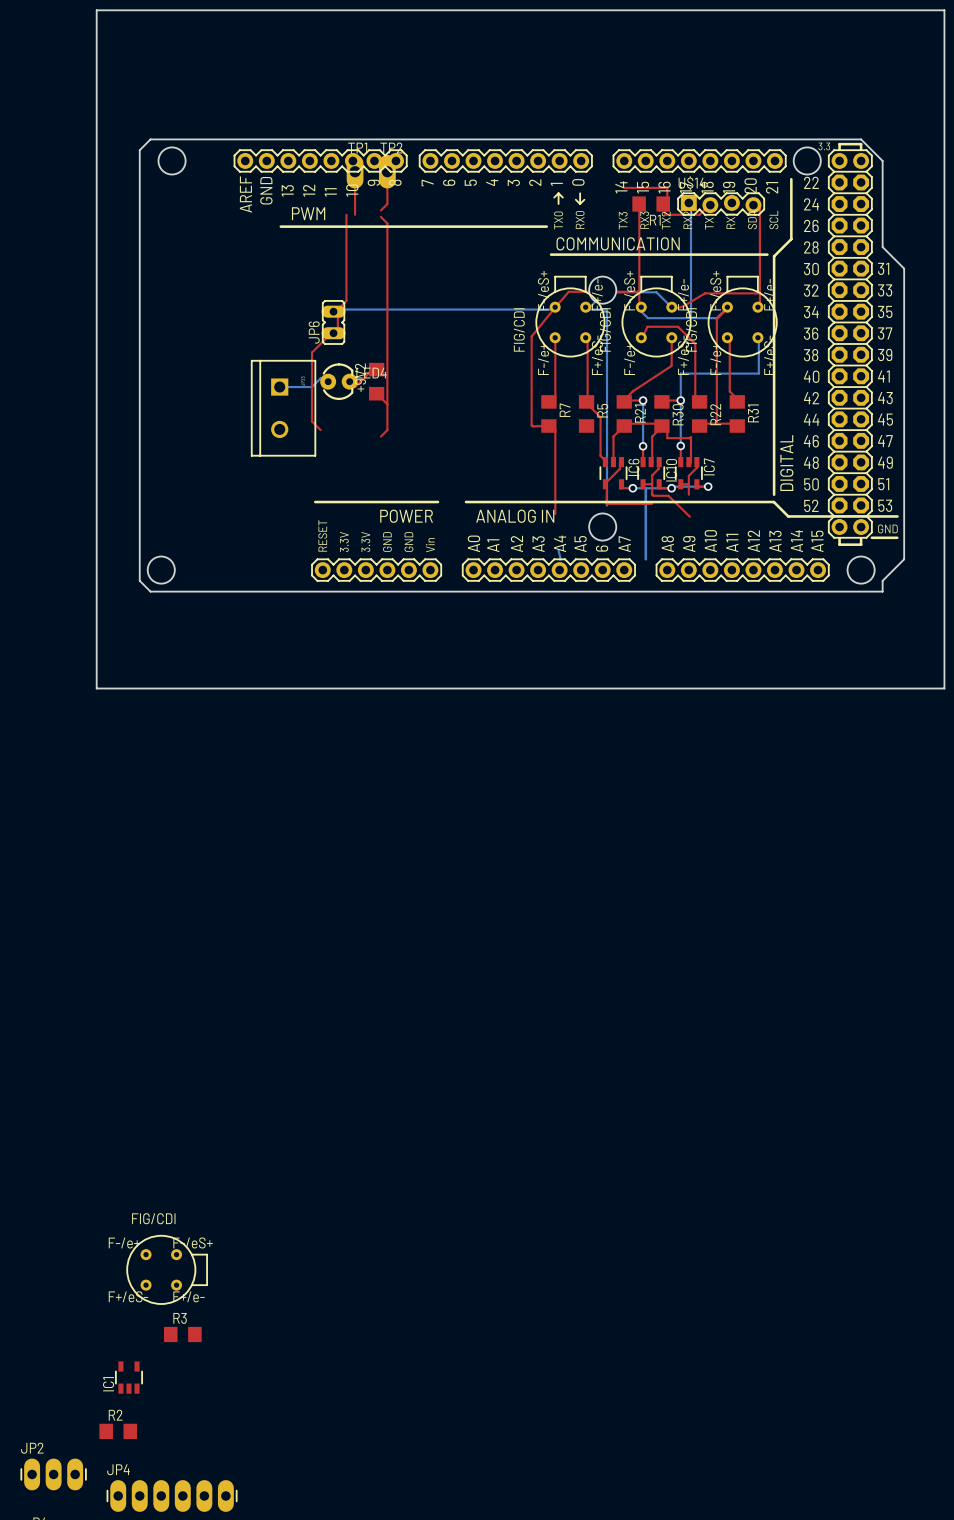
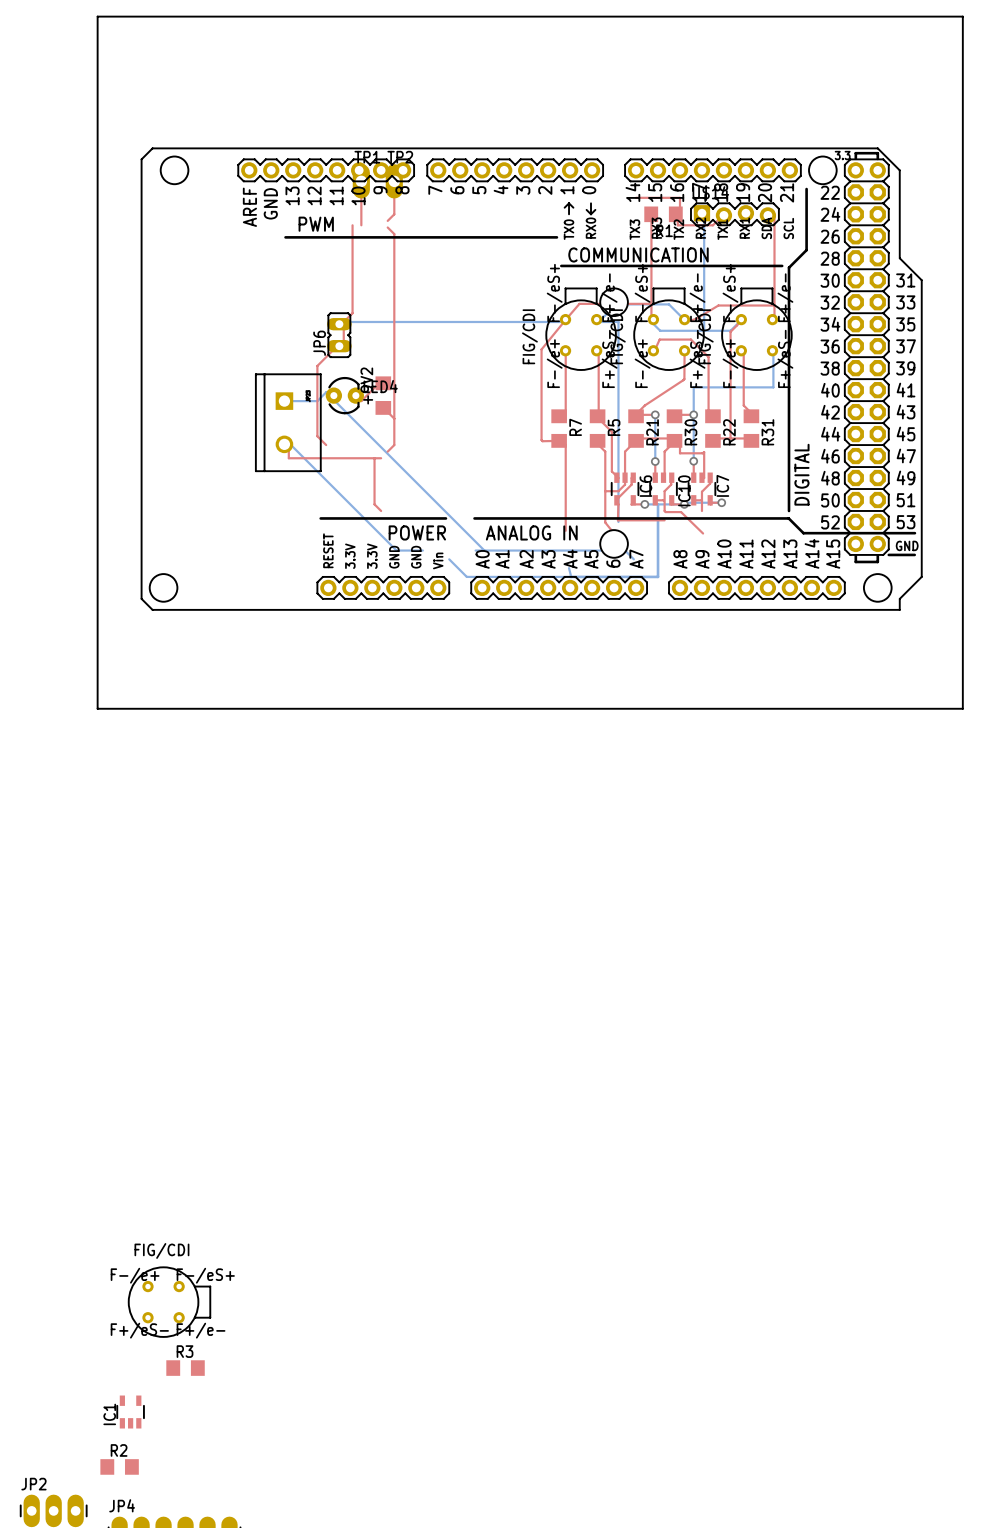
bottom track: none -> (333, 395) (334, 401) (484, 550)
top track: none -> (597, 440) (598, 445) (605, 451) (605, 522) (611, 530) (614, 530)
bottom track: none -> (284, 444) (291, 445) (396, 550) (422, 550)
top track: none -> (284, 444) (288, 445) (288, 458) (381, 458)
top track: none -> (374, 458) (374, 504) (381, 510)
top track: none -> (625, 477) (625, 484) (618, 491) (605, 491)
bottom track: none -> (475, 550) (625, 550) (633, 559)
bottom track: none -> (449, 559) (466, 576) (658, 576)

